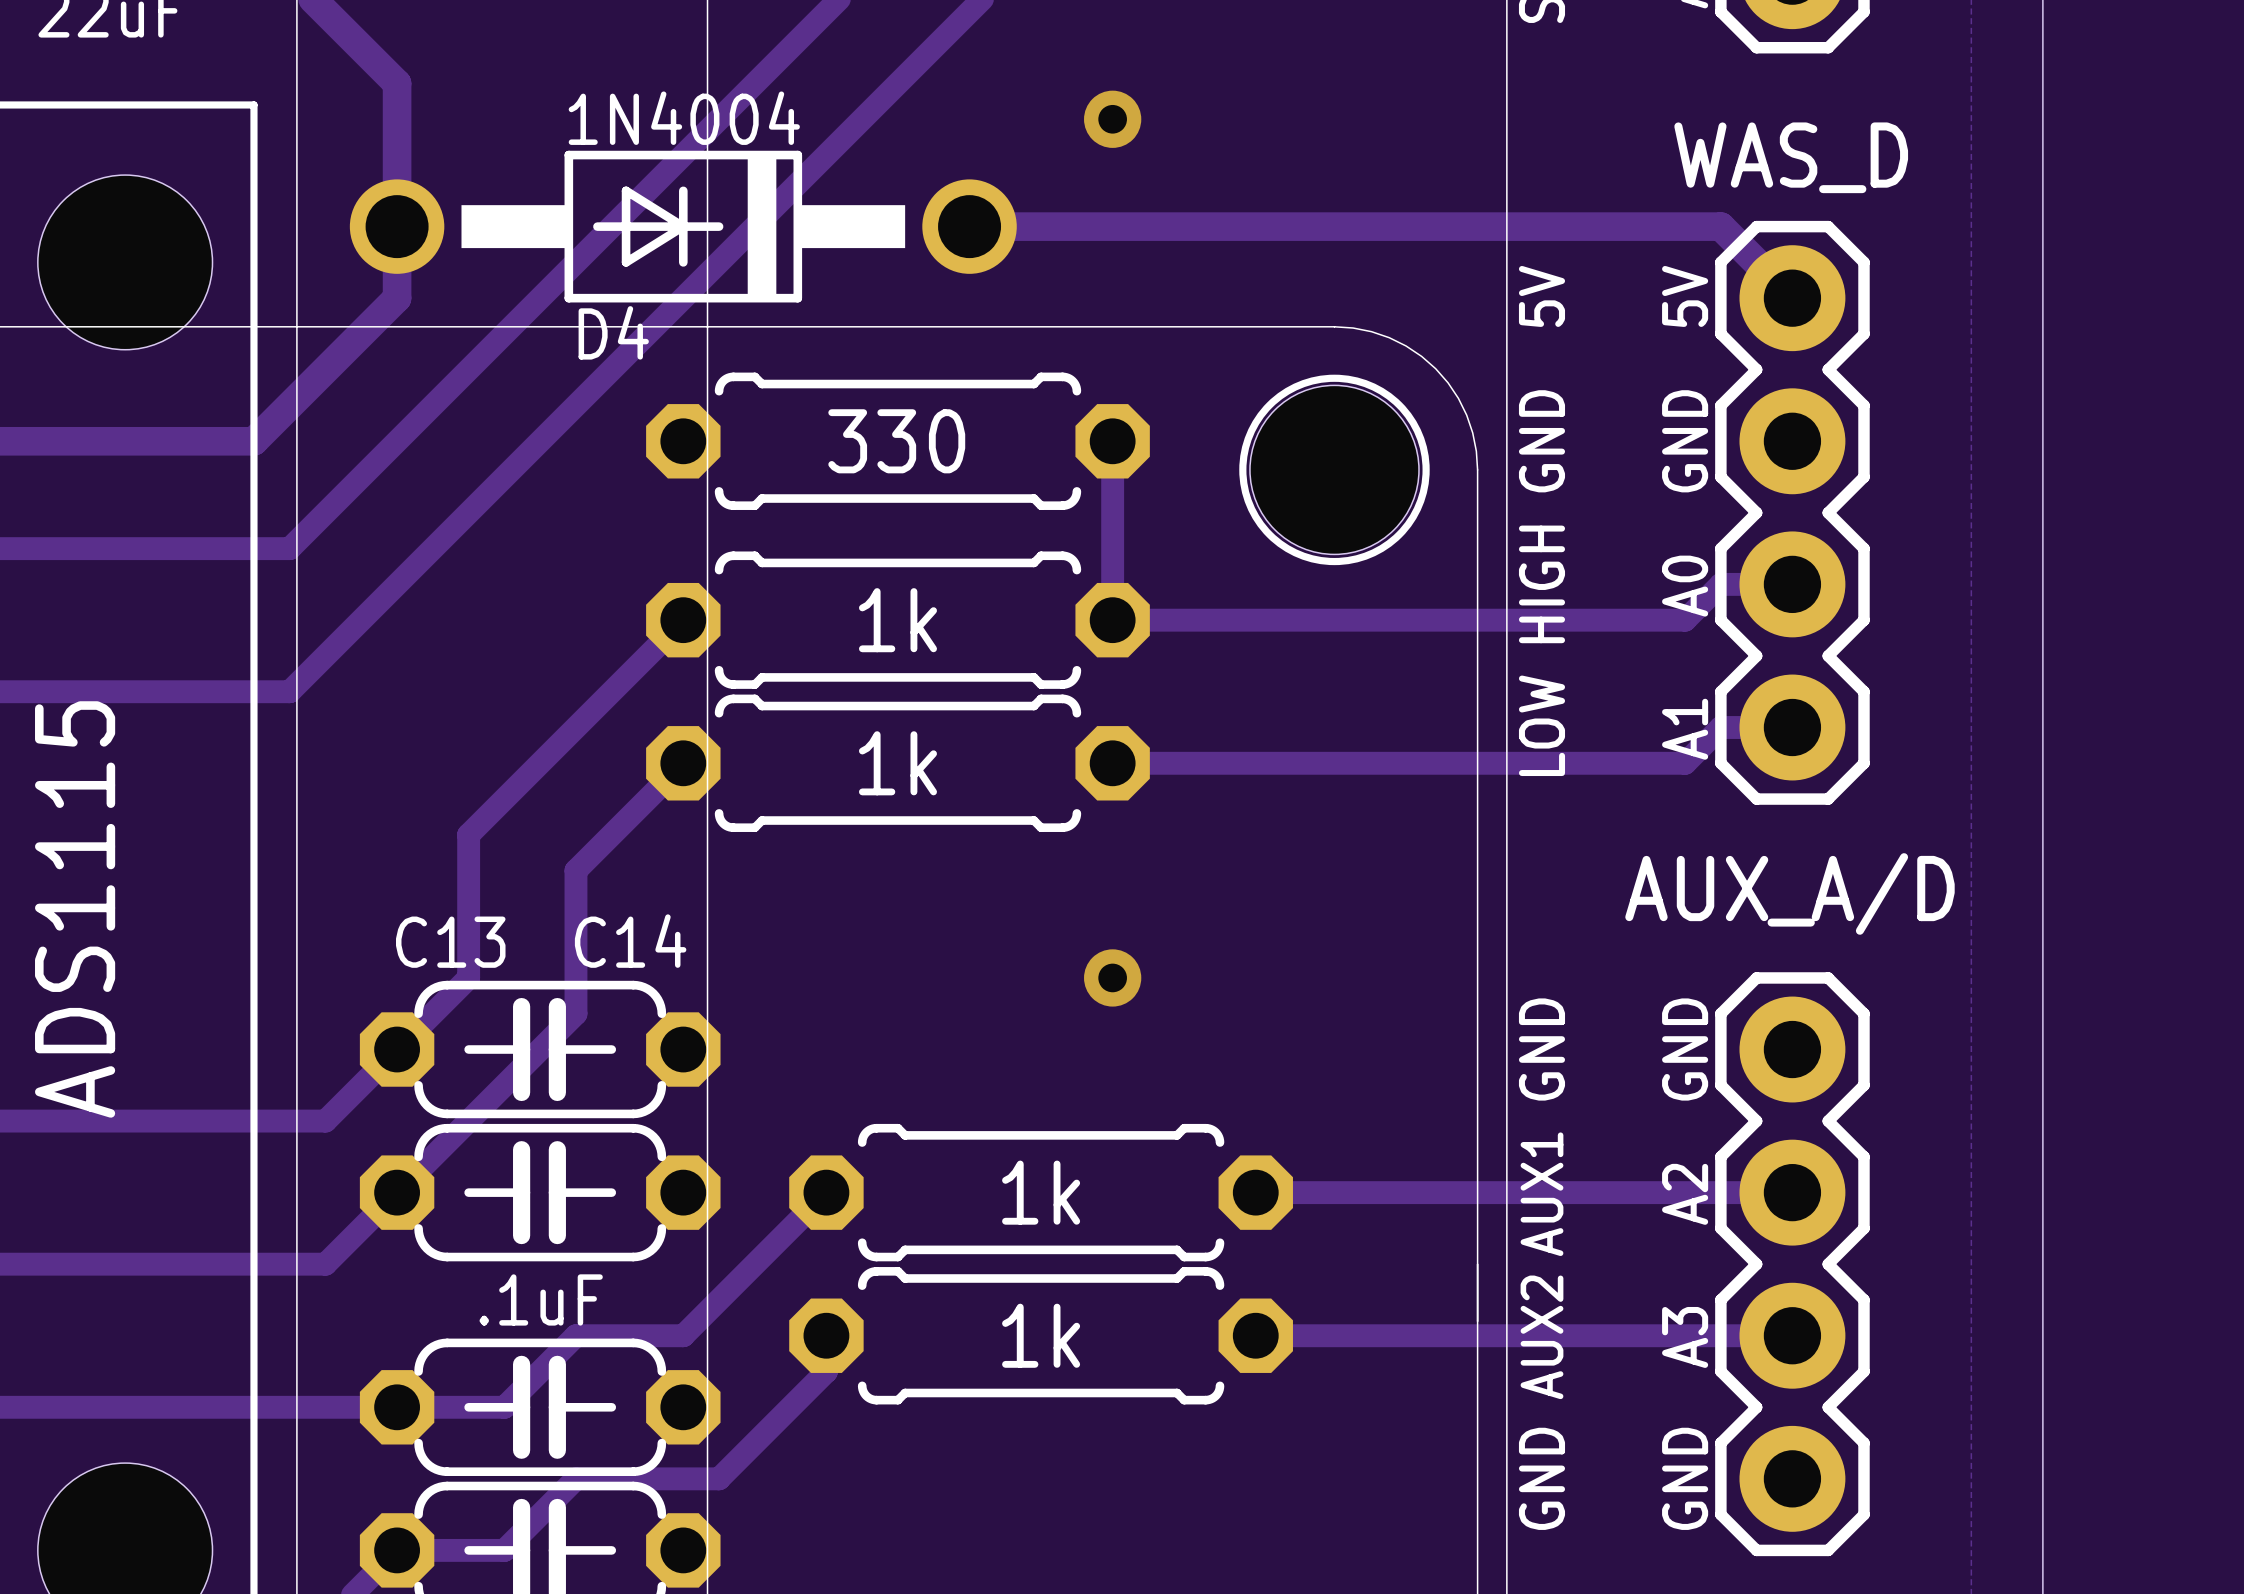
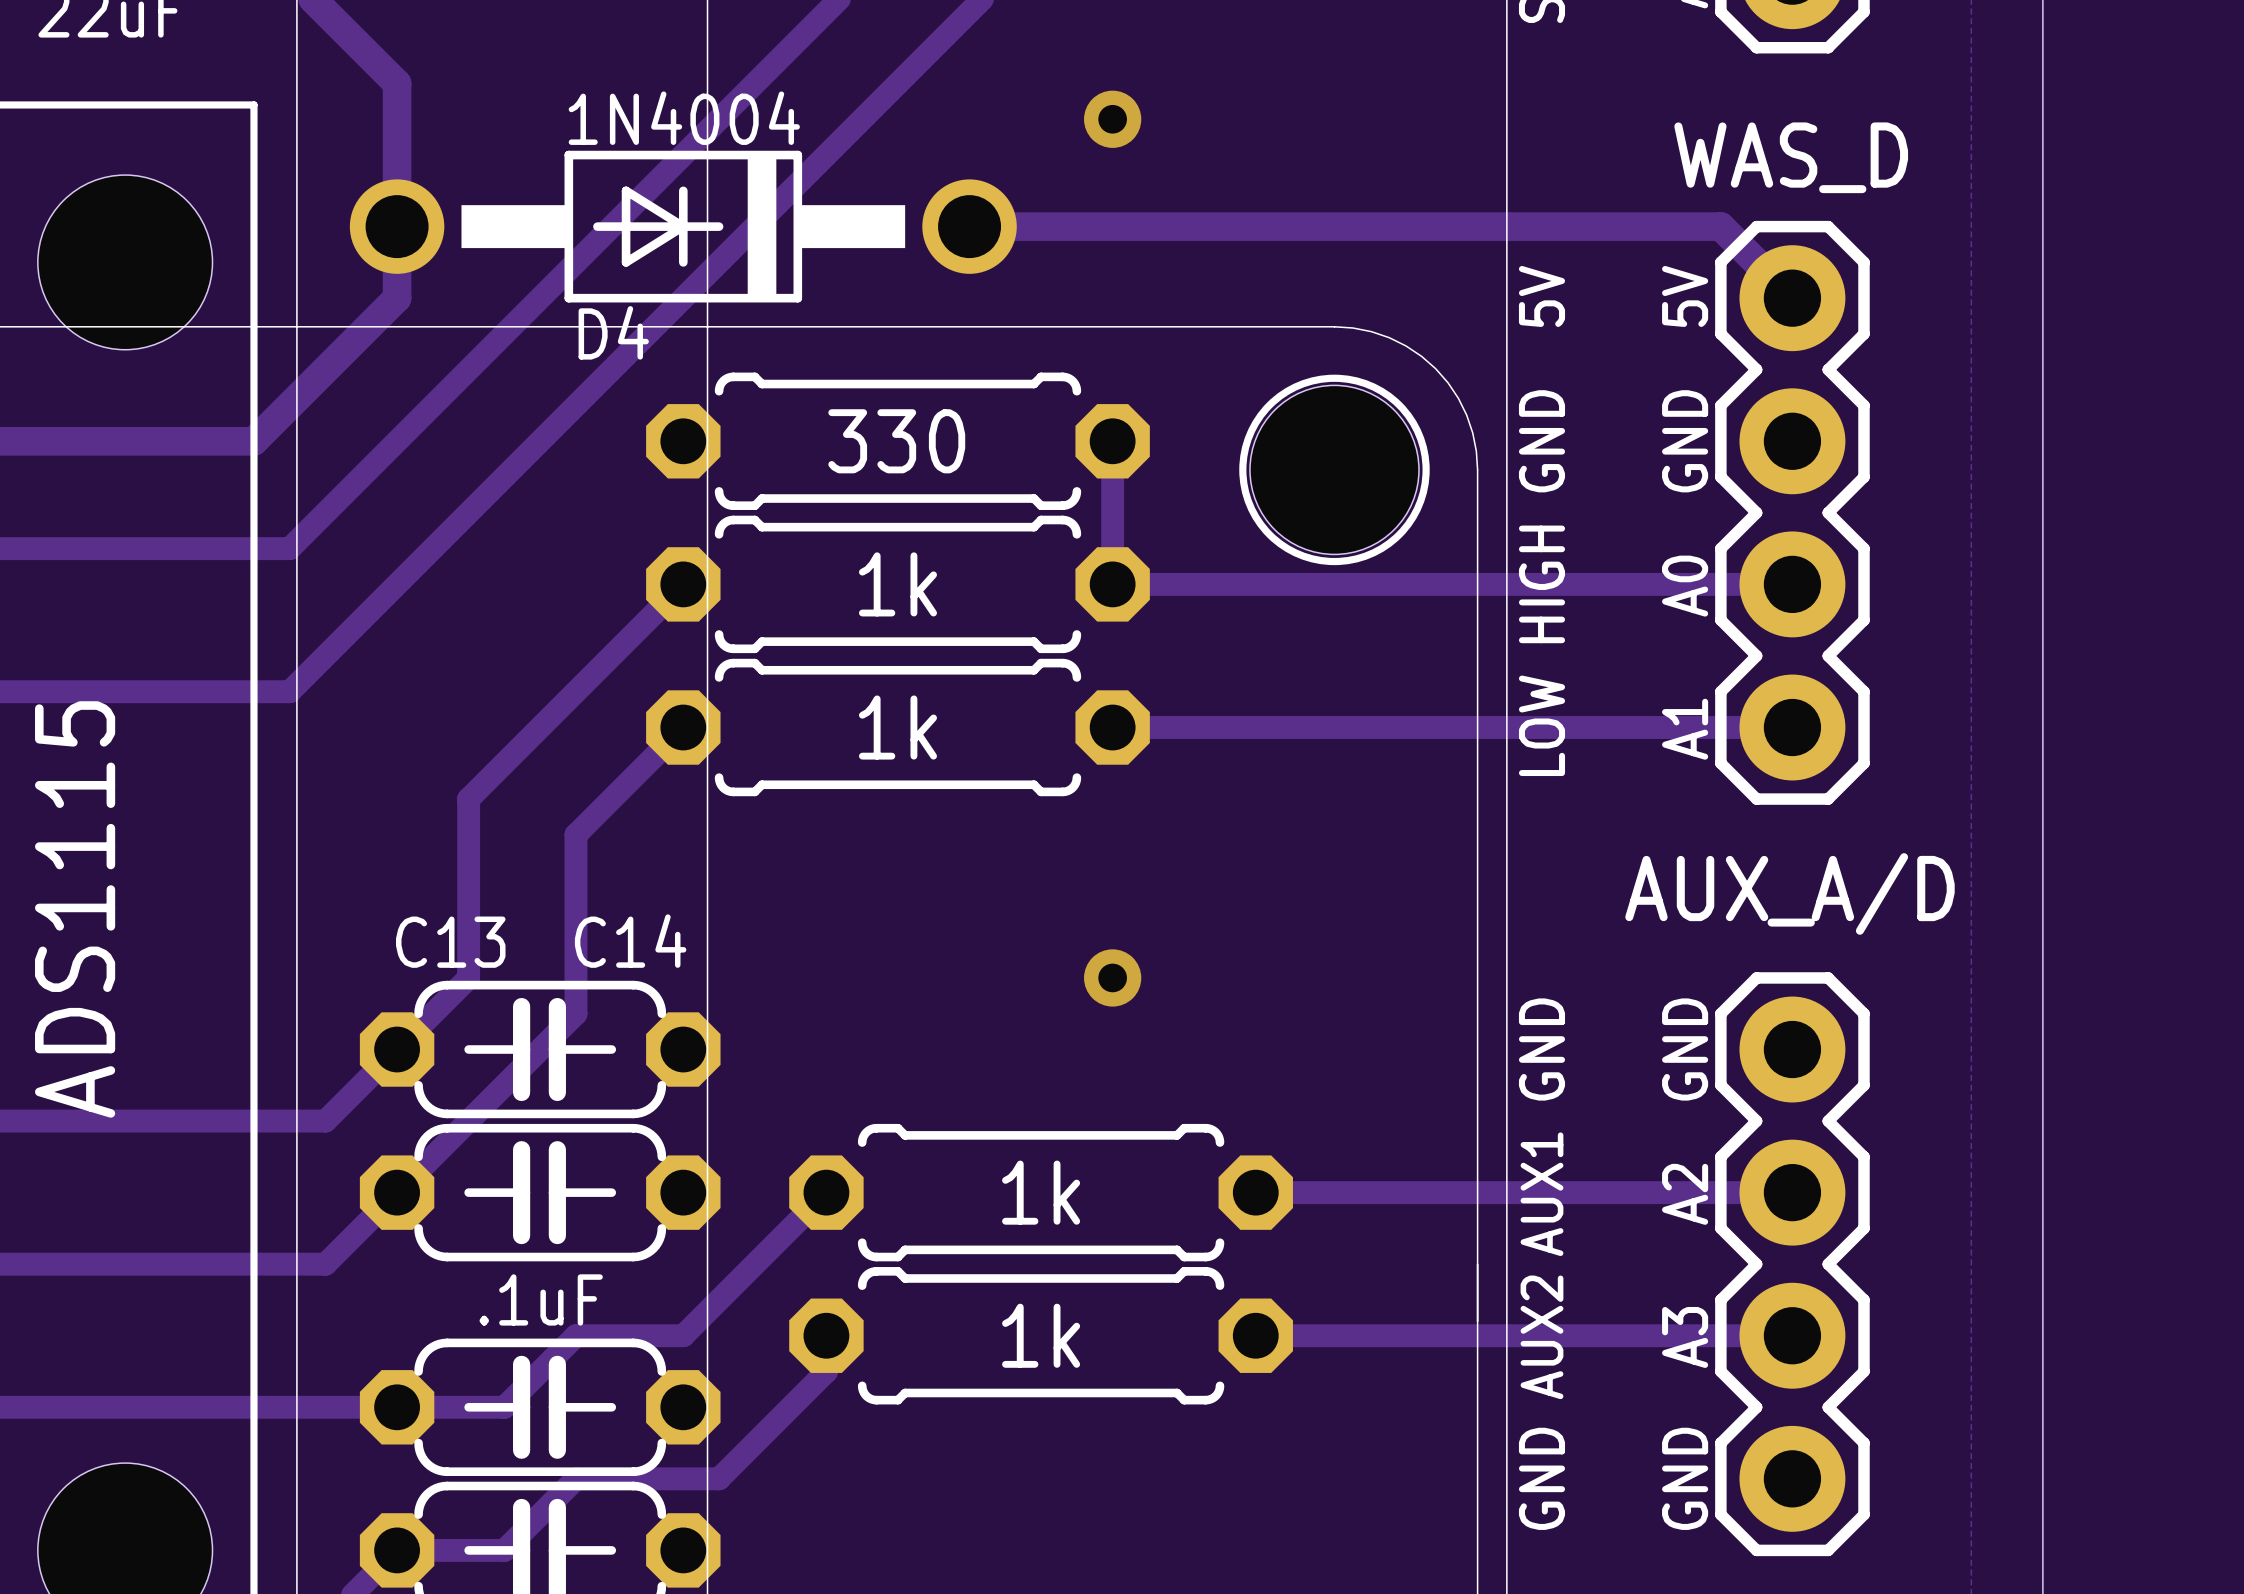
track: (1112, 584) (1112, 620) (1685, 620) (1720, 584) -> (1112, 584) (1720, 584)
track: (683, 620) (468, 834) -> (683, 584) (468, 799) (468, 834)
part position: (897, 620) -> (897, 584)
track: (1720, 727) (1685, 763) (1112, 763) -> (1720, 727) (1112, 727)
track: (683, 763) (575, 870) -> (683, 727) (575, 834) (575, 870)
part position: (897, 763) -> (897, 727)

